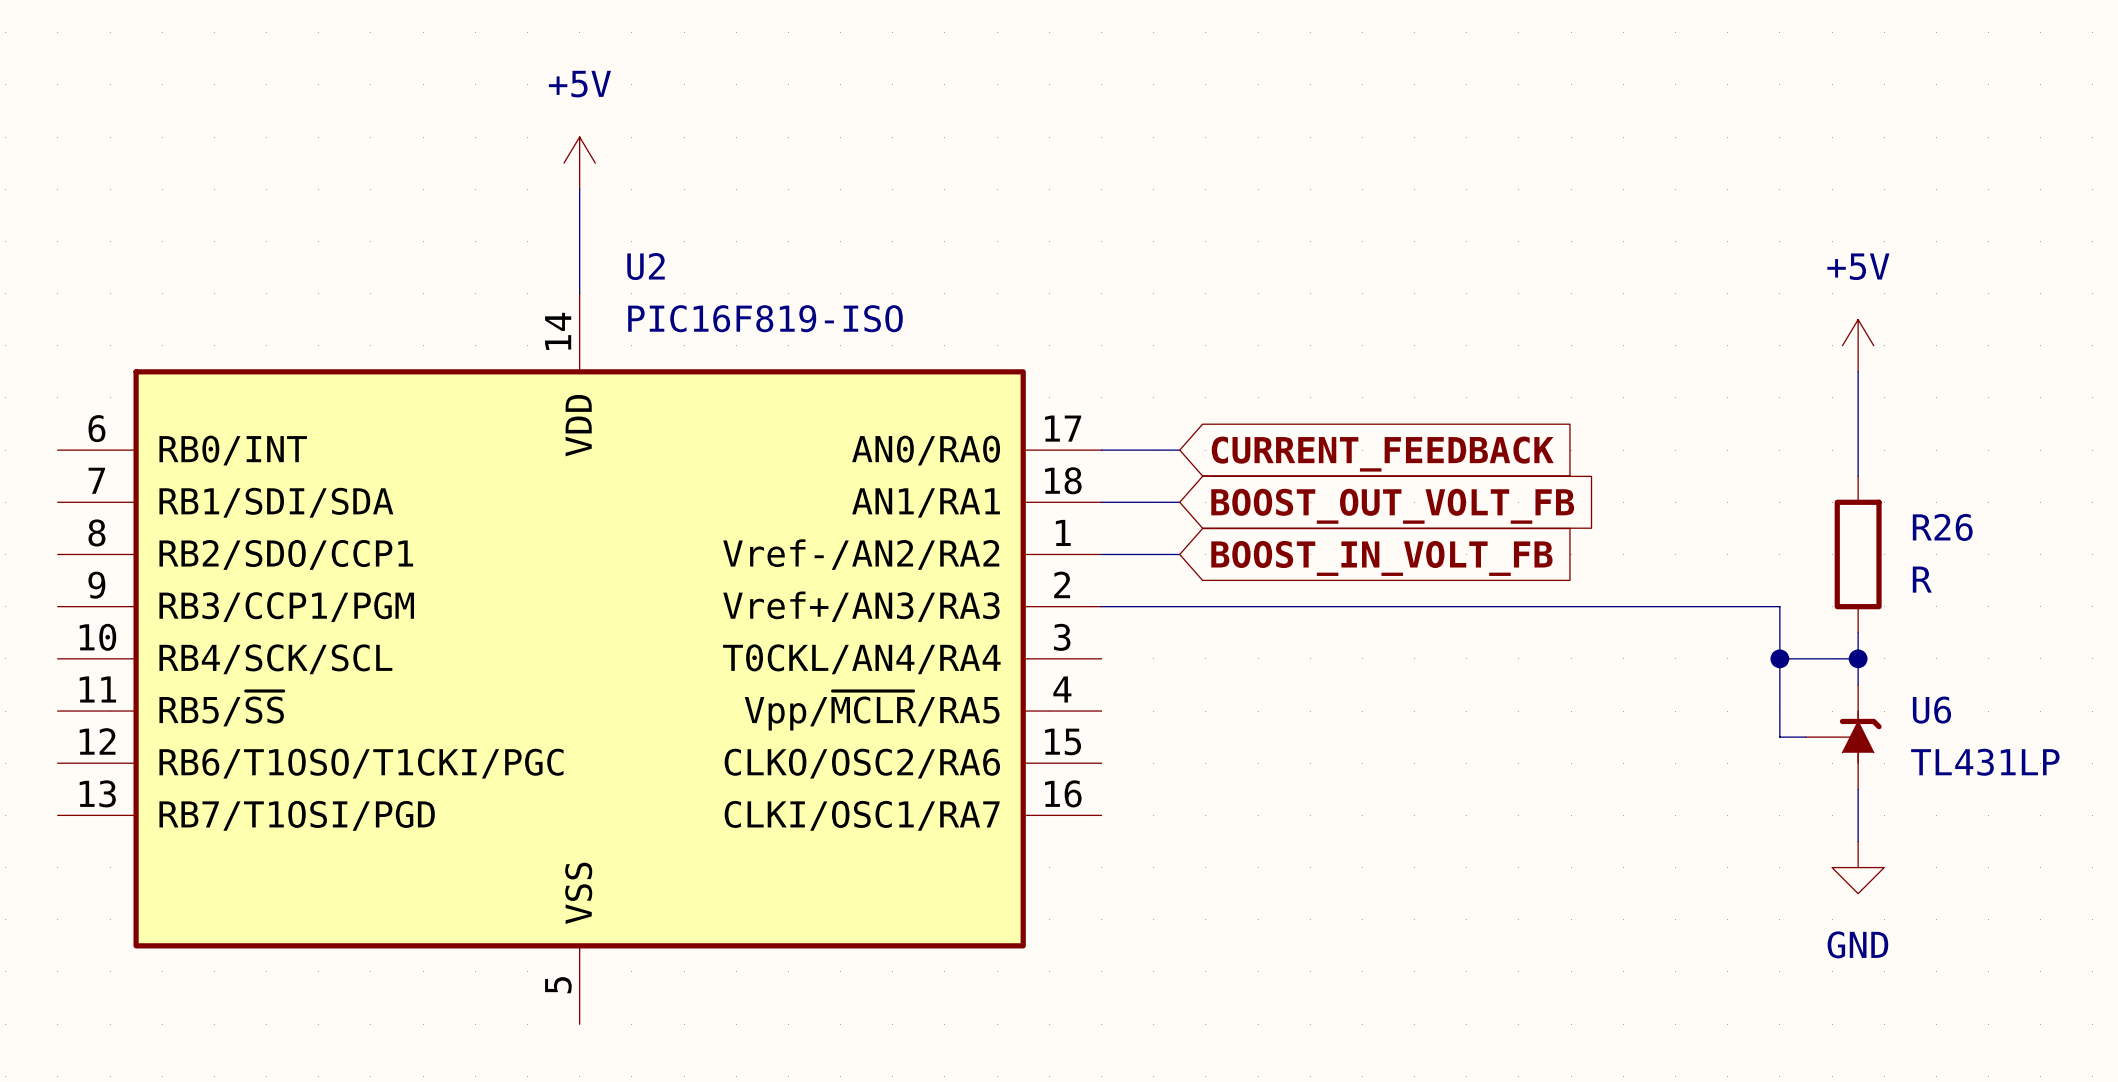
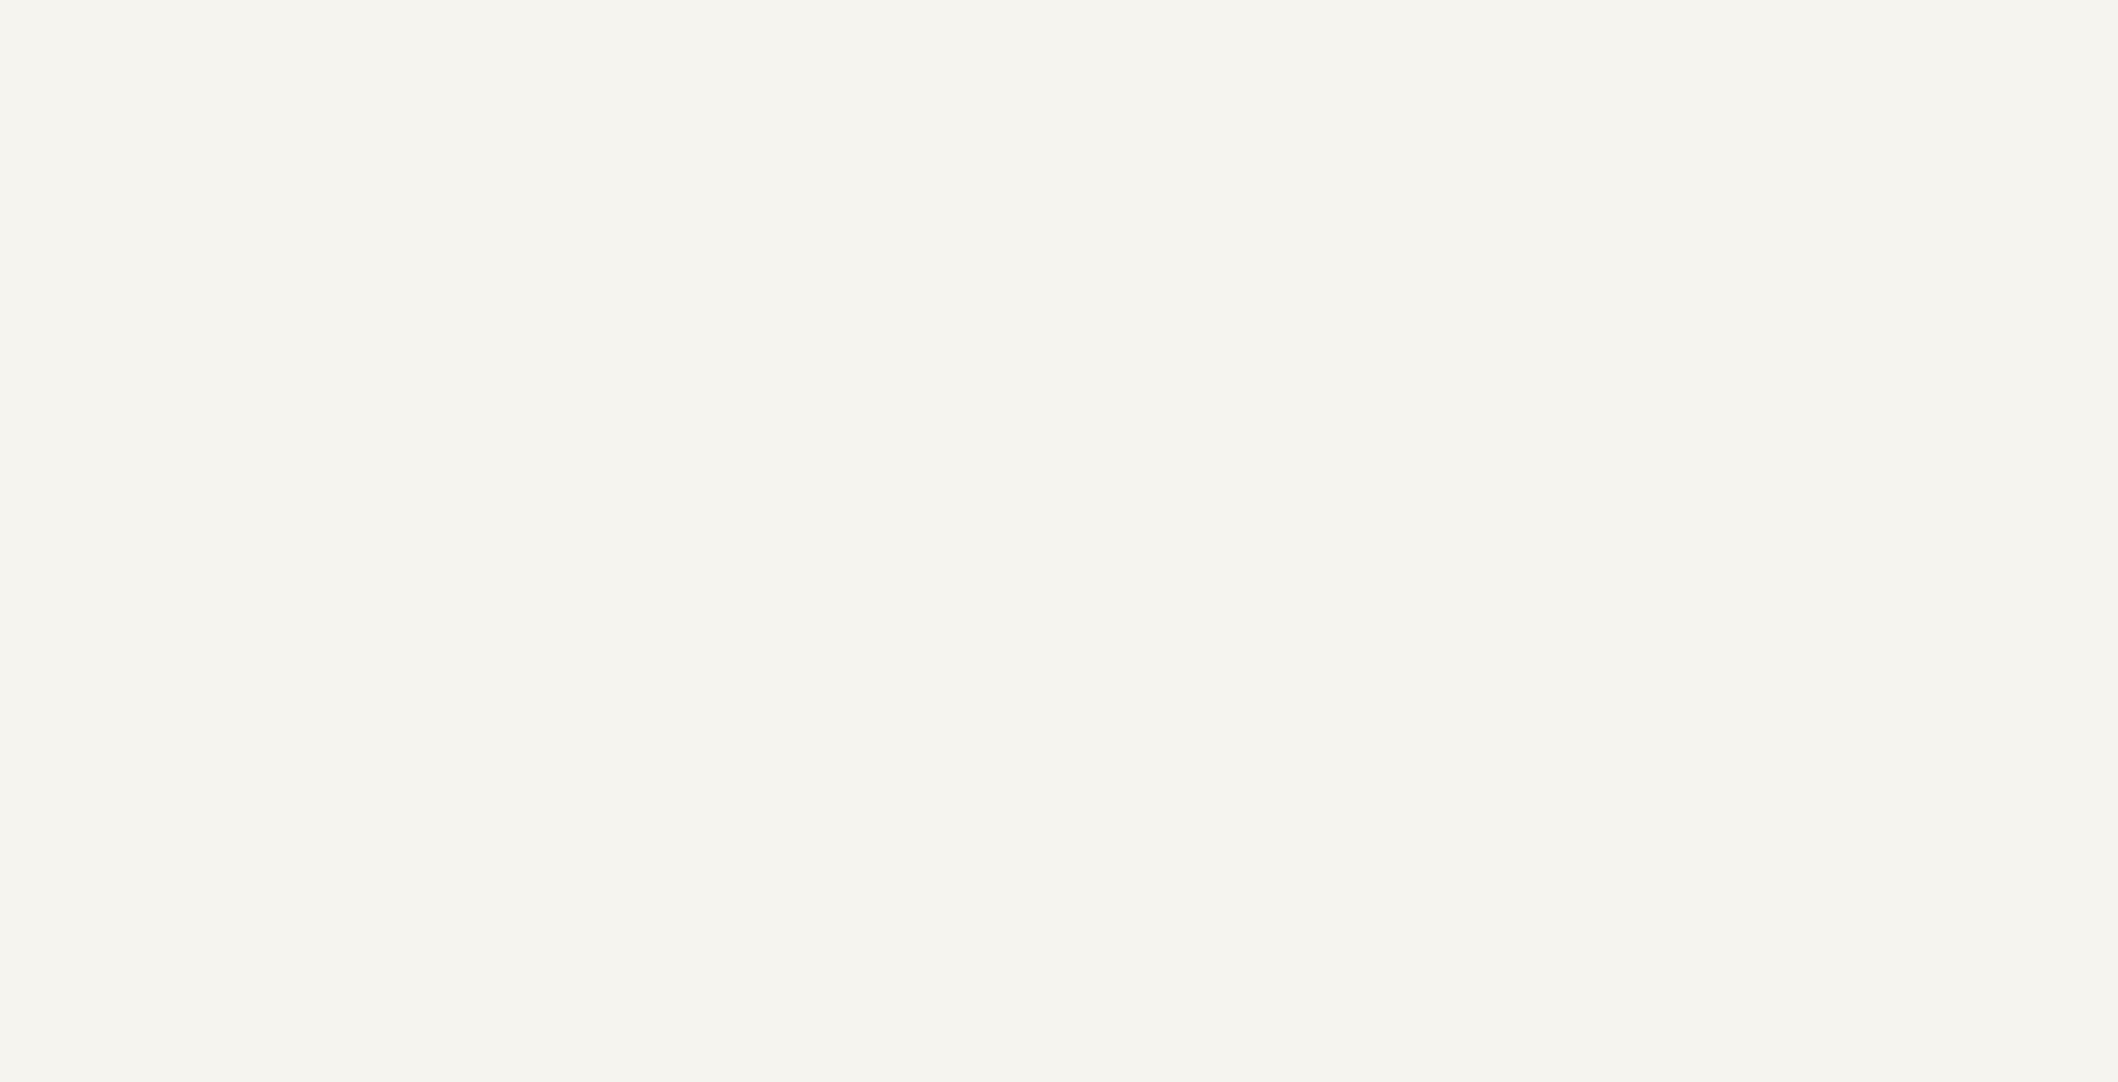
power symbol: +5V (579, 163) -> none
wire: (579, 189) (579, 293) -> none
power symbol: +5V (1858, 345) -> none
wire: (1858, 371) (1858, 476) -> none
wire: (1101, 450) (1179, 450) -> none
global label: CURRENT_FEEDBACK (1382, 454) -> none
wire: (1101, 502) (1179, 502) -> none
global label: BOOST_OUT_VOLT_FB (1392, 506) -> none
wire: (1101, 554) (1179, 554) -> none
R26: R (1858, 554) -> none
global label: BOOST_IN_VOLT_FB (1381, 558) -> none
wire: (1101, 606) (1779, 606) (1779, 737) (1805, 737) -> none
wire: (1858, 632) (1858, 684) -> none
U2: PIC16F819-ISO (579, 658) -> none
wire: (1779, 658) (1858, 658) -> none
junction: (1779, 658) -> none
junction: (1858, 658) -> none
U6: TL431LP (1843, 737) -> none
wire: (1858, 789) (1858, 841) -> none
power symbol: GND (1858, 867) -> none

